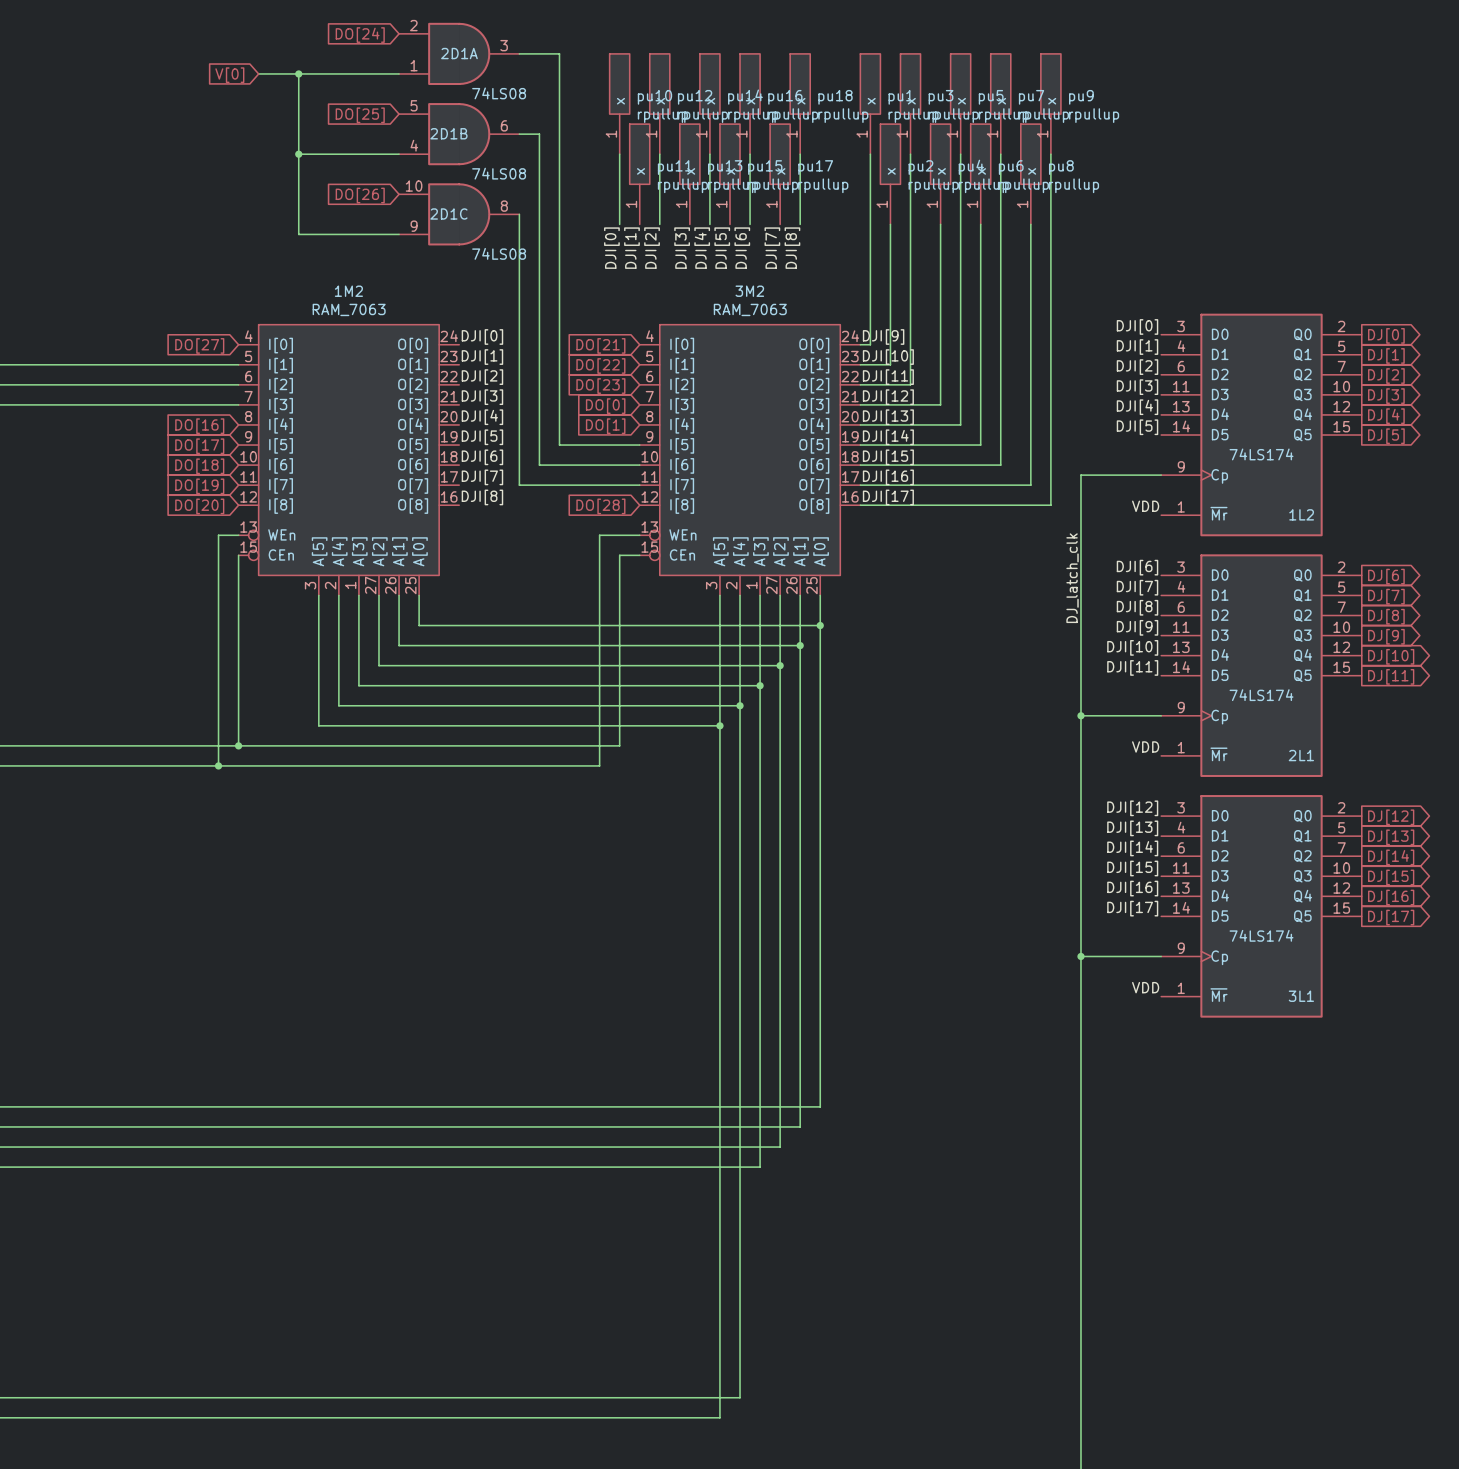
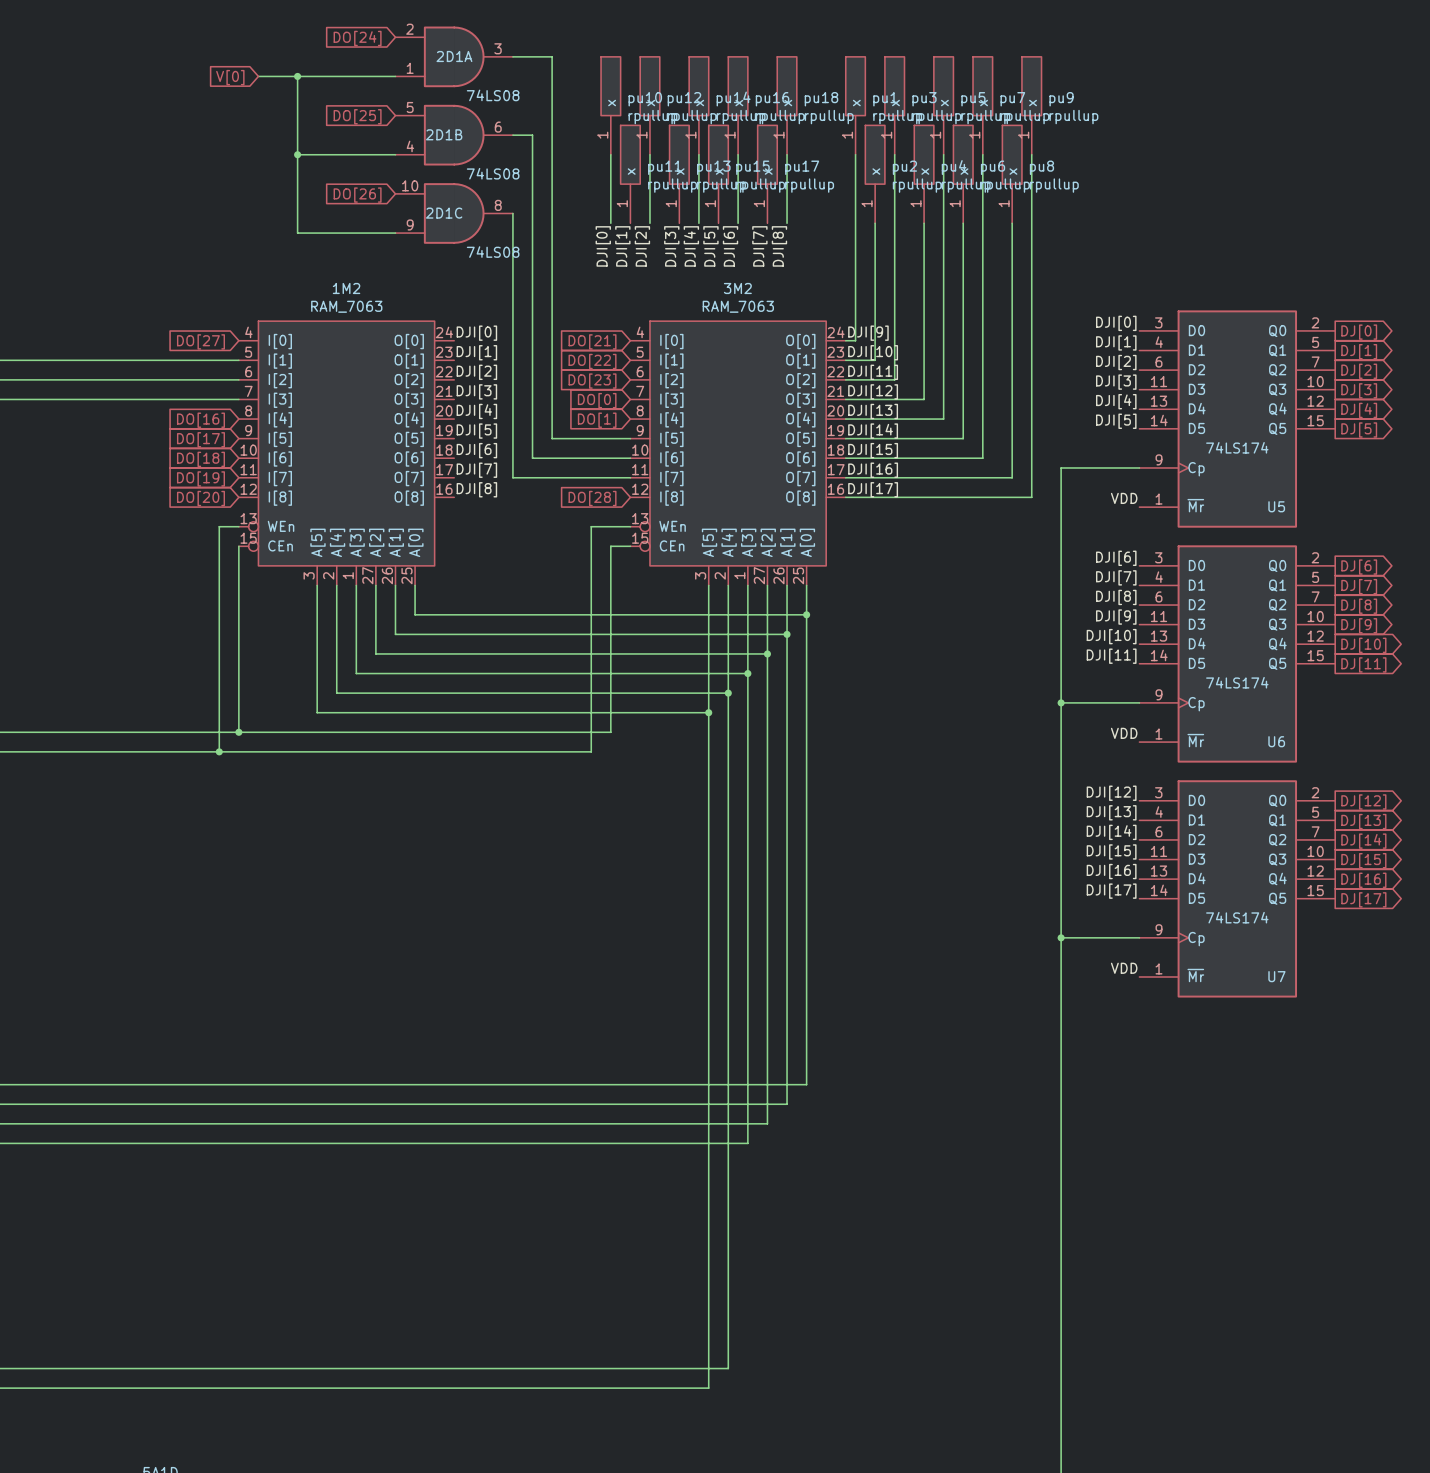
1L2 name: 1L2 (1301, 514) -> U5 (1276, 506)
label: DJ_latch_clk (1072, 578) -> none
2L1 name: 2L1 (1301, 755) -> U6 (1276, 741)
3L1 name: 3L1 (1301, 996) -> U7 (1276, 976)

